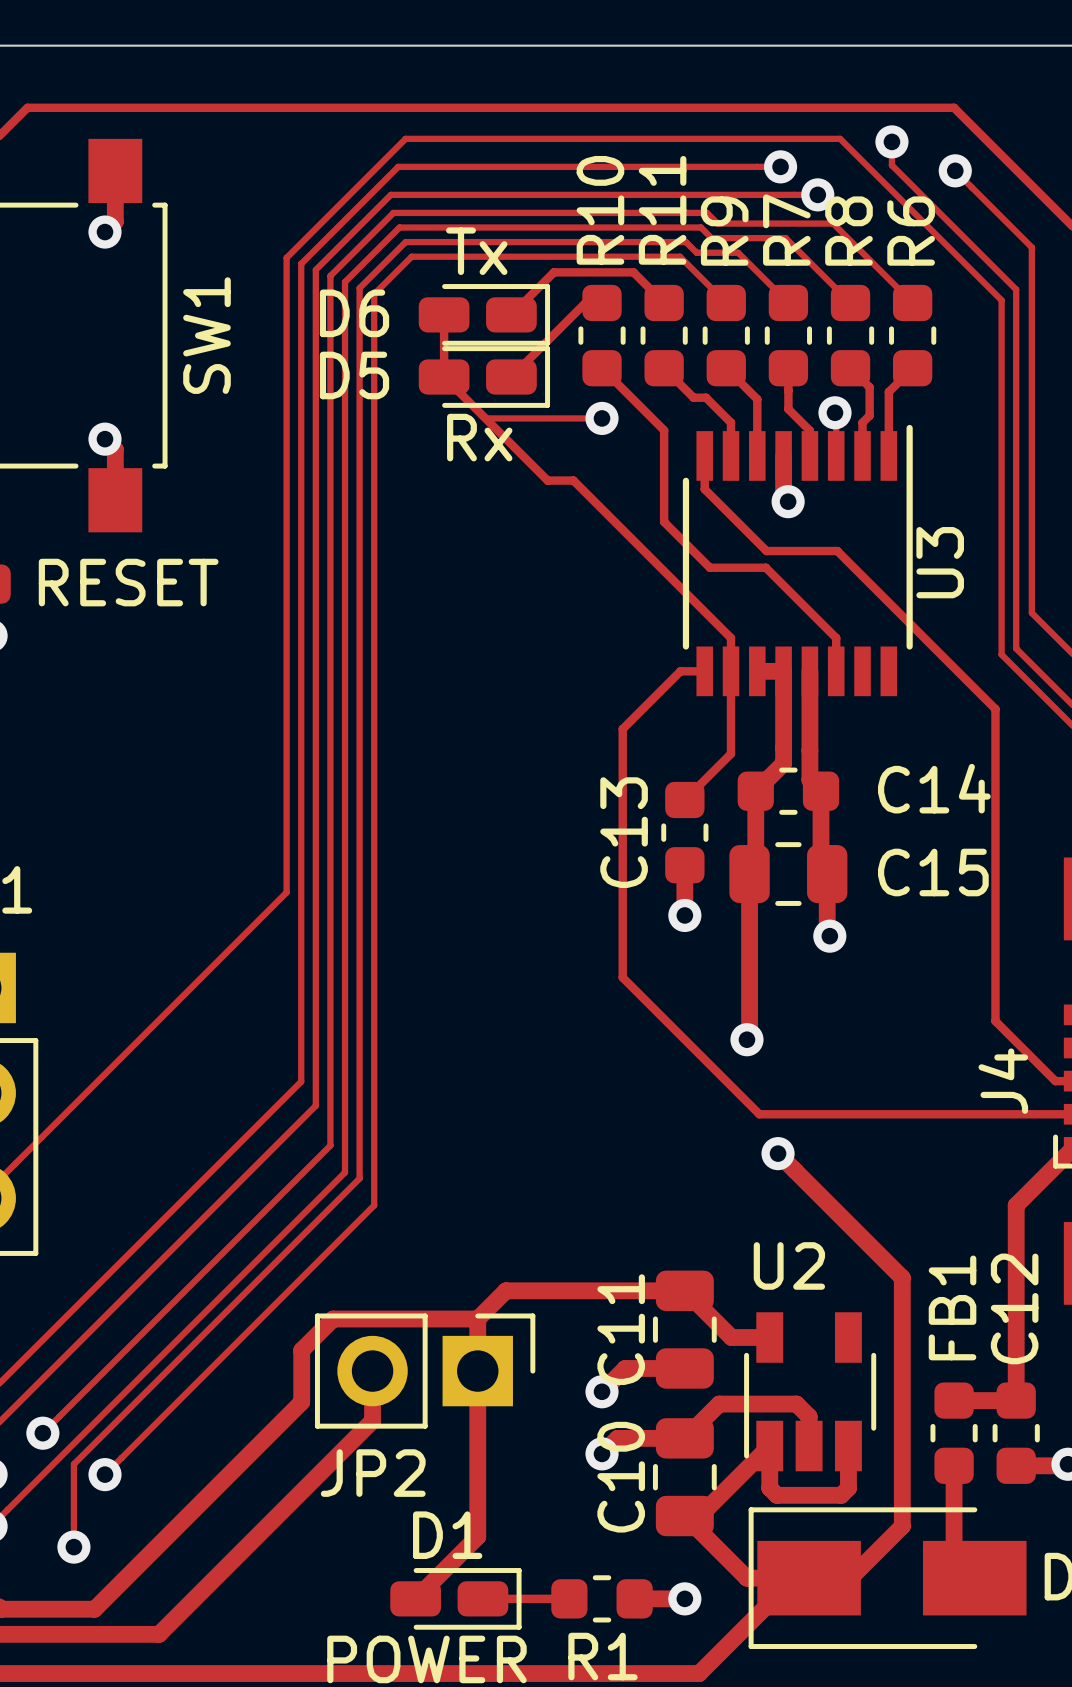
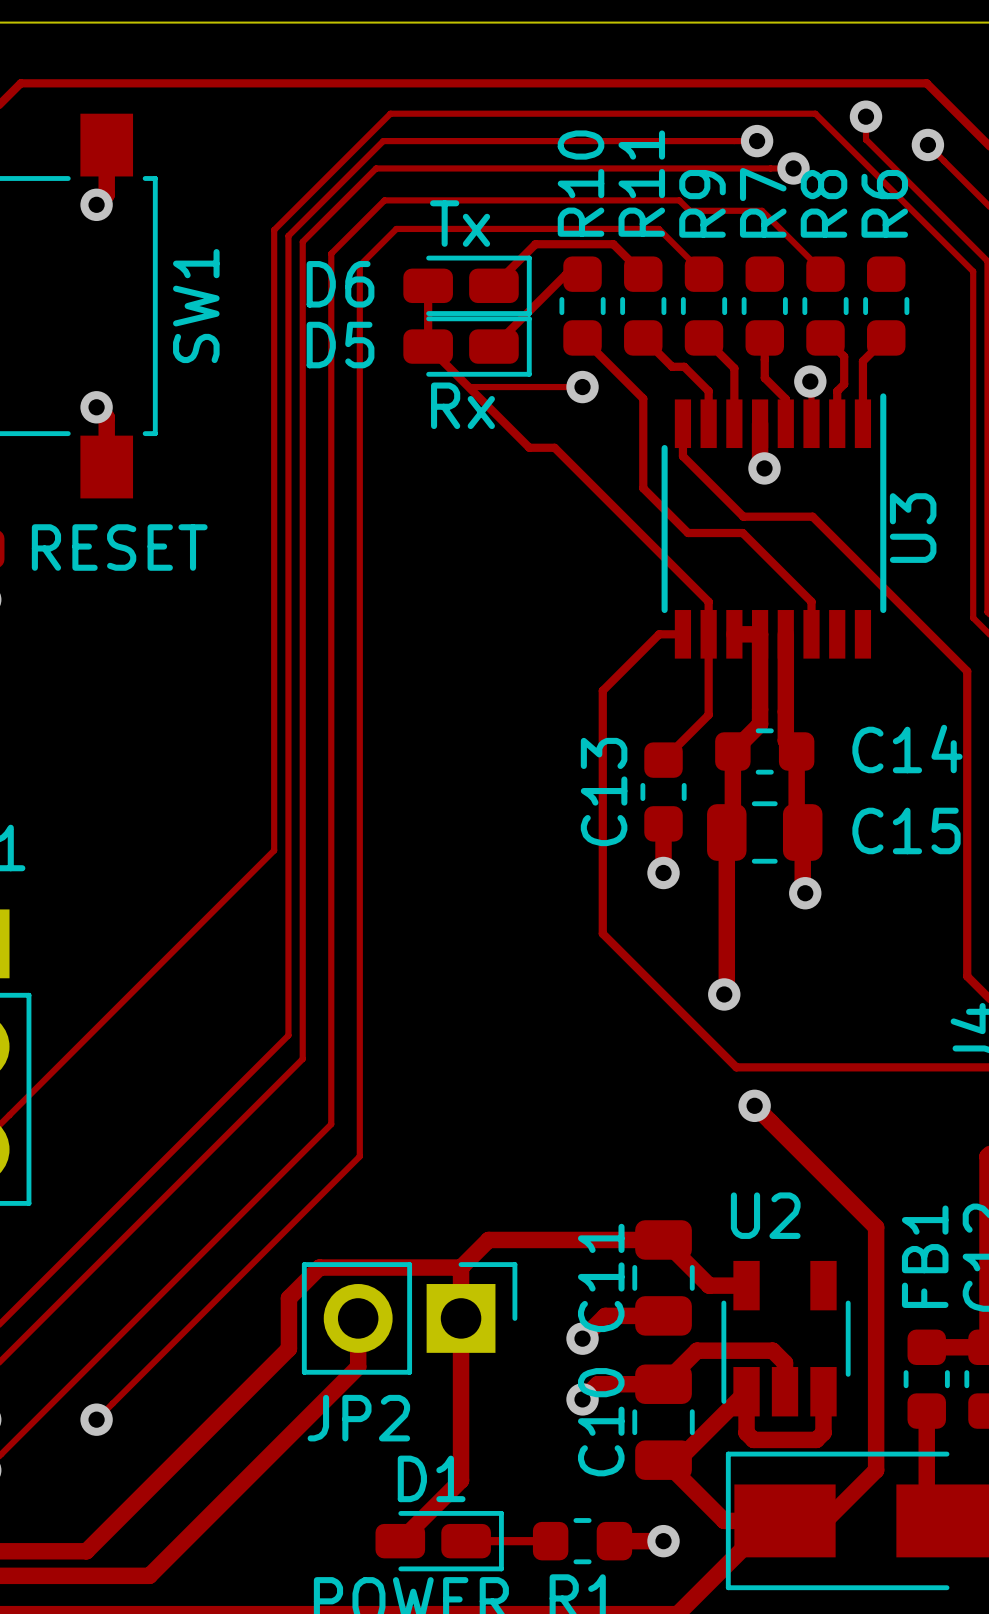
track: (788, 302) (738, 252) (696, 252) (686, 242) (405, 242) (359, 288) (359, 1178) (73, 1464) (73, 1547) -> none
track: (912, 302) (833, 223) (717, 223) (707, 212) (393, 212) (330, 275) (330, 1145) (42, 1433) -> none
via: (42, 1433) -> none
via: (73, 1547) -> none

